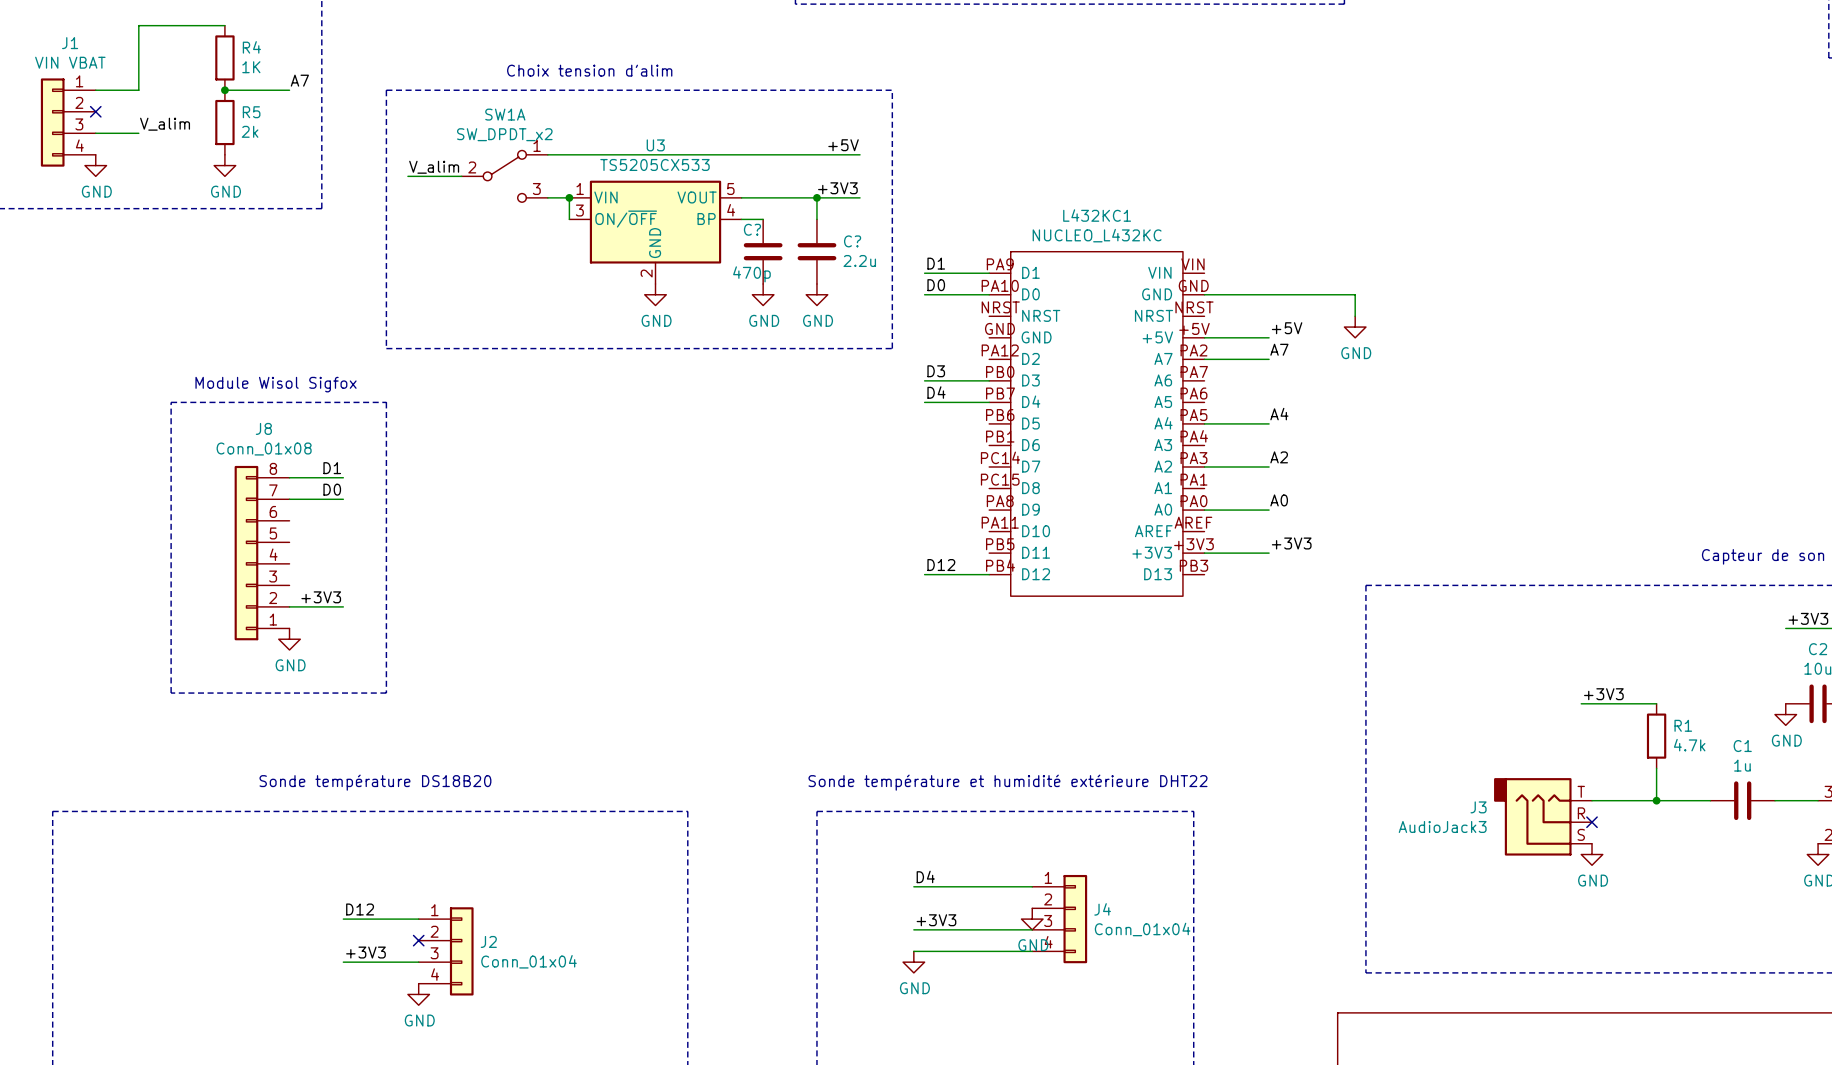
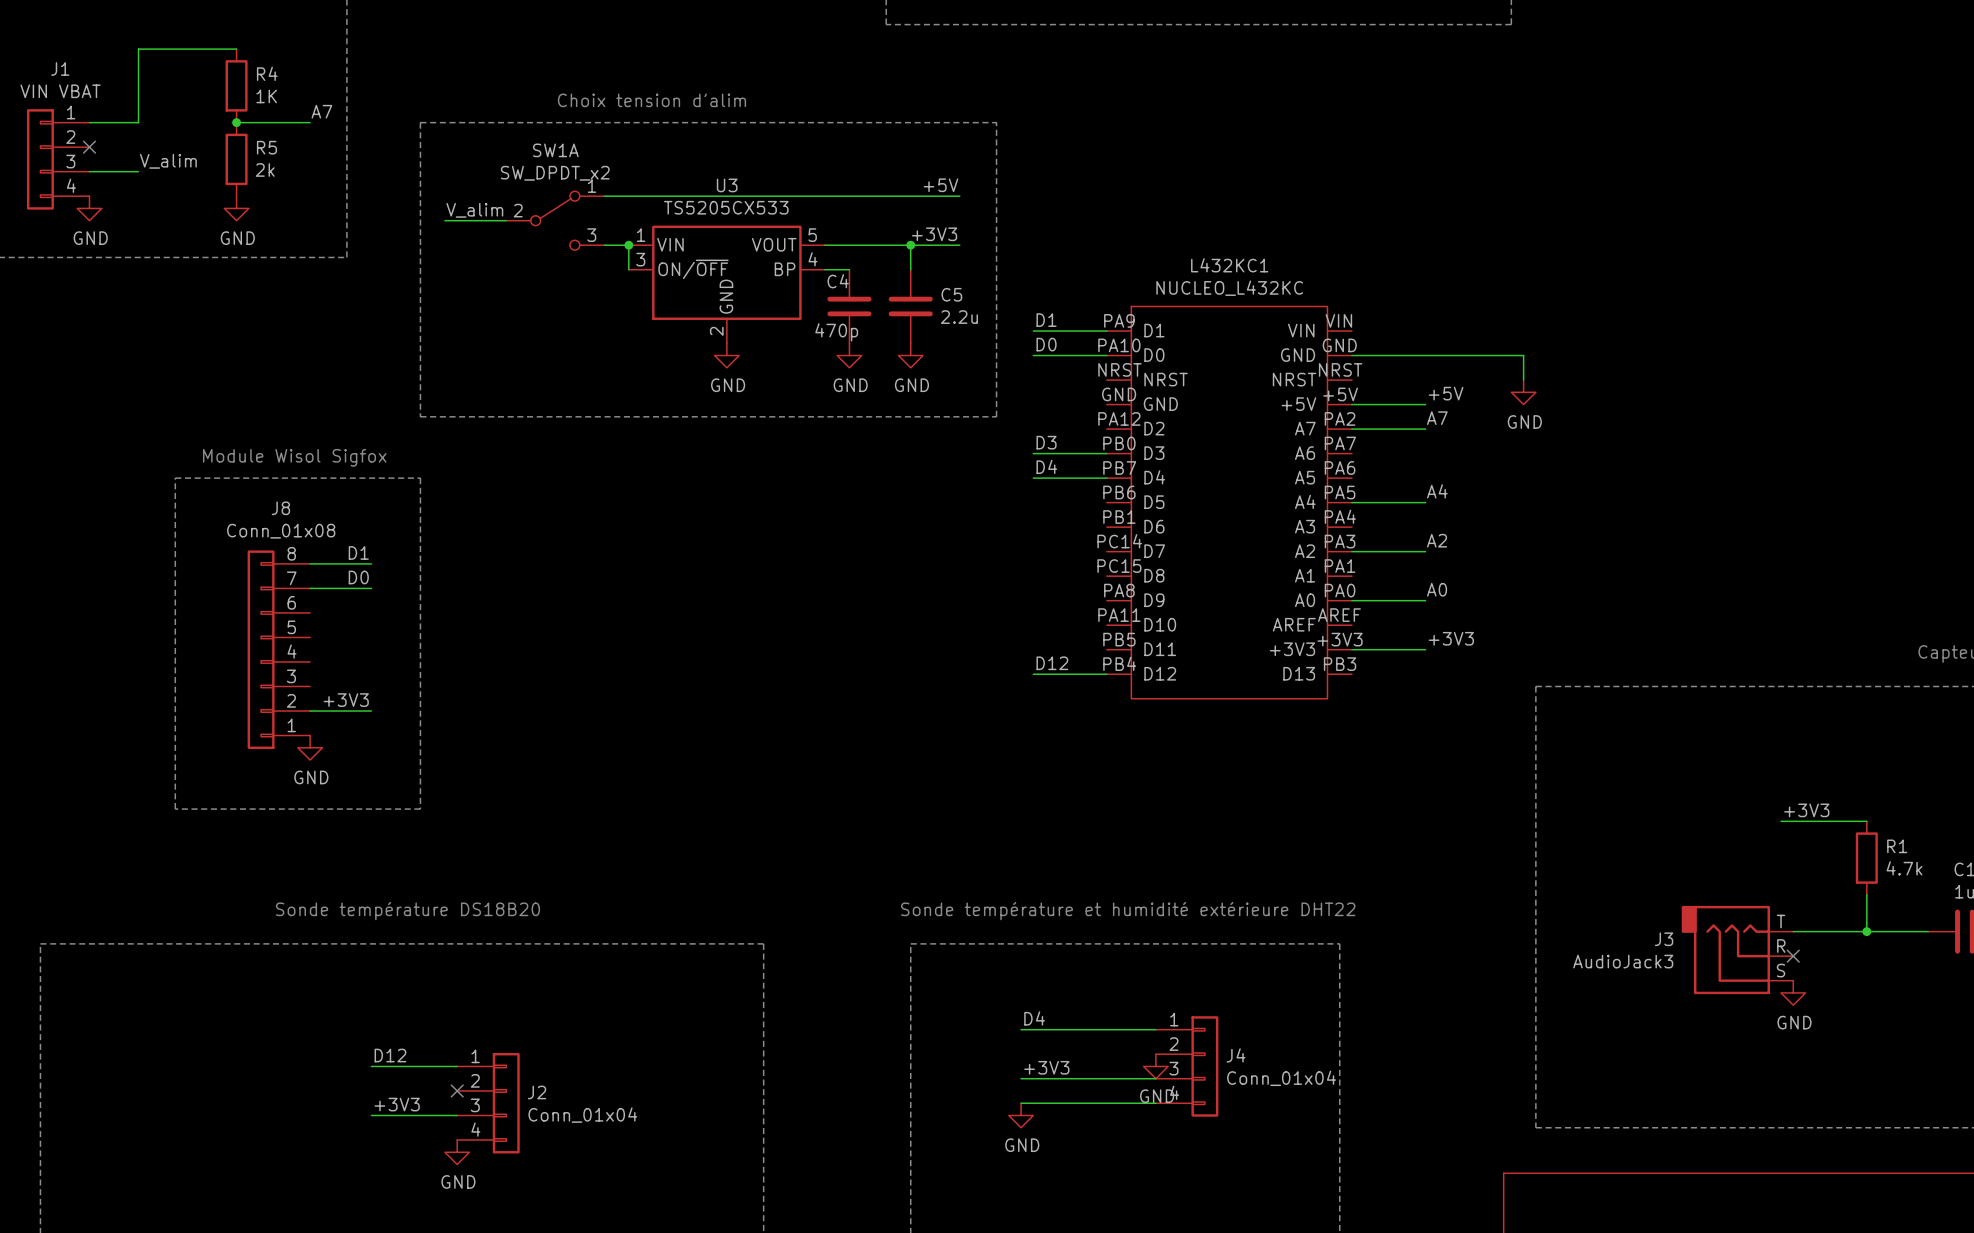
C? name: C? (752, 229) -> C4 (838, 281)
C? name: C? (852, 241) -> C5 (951, 294)

